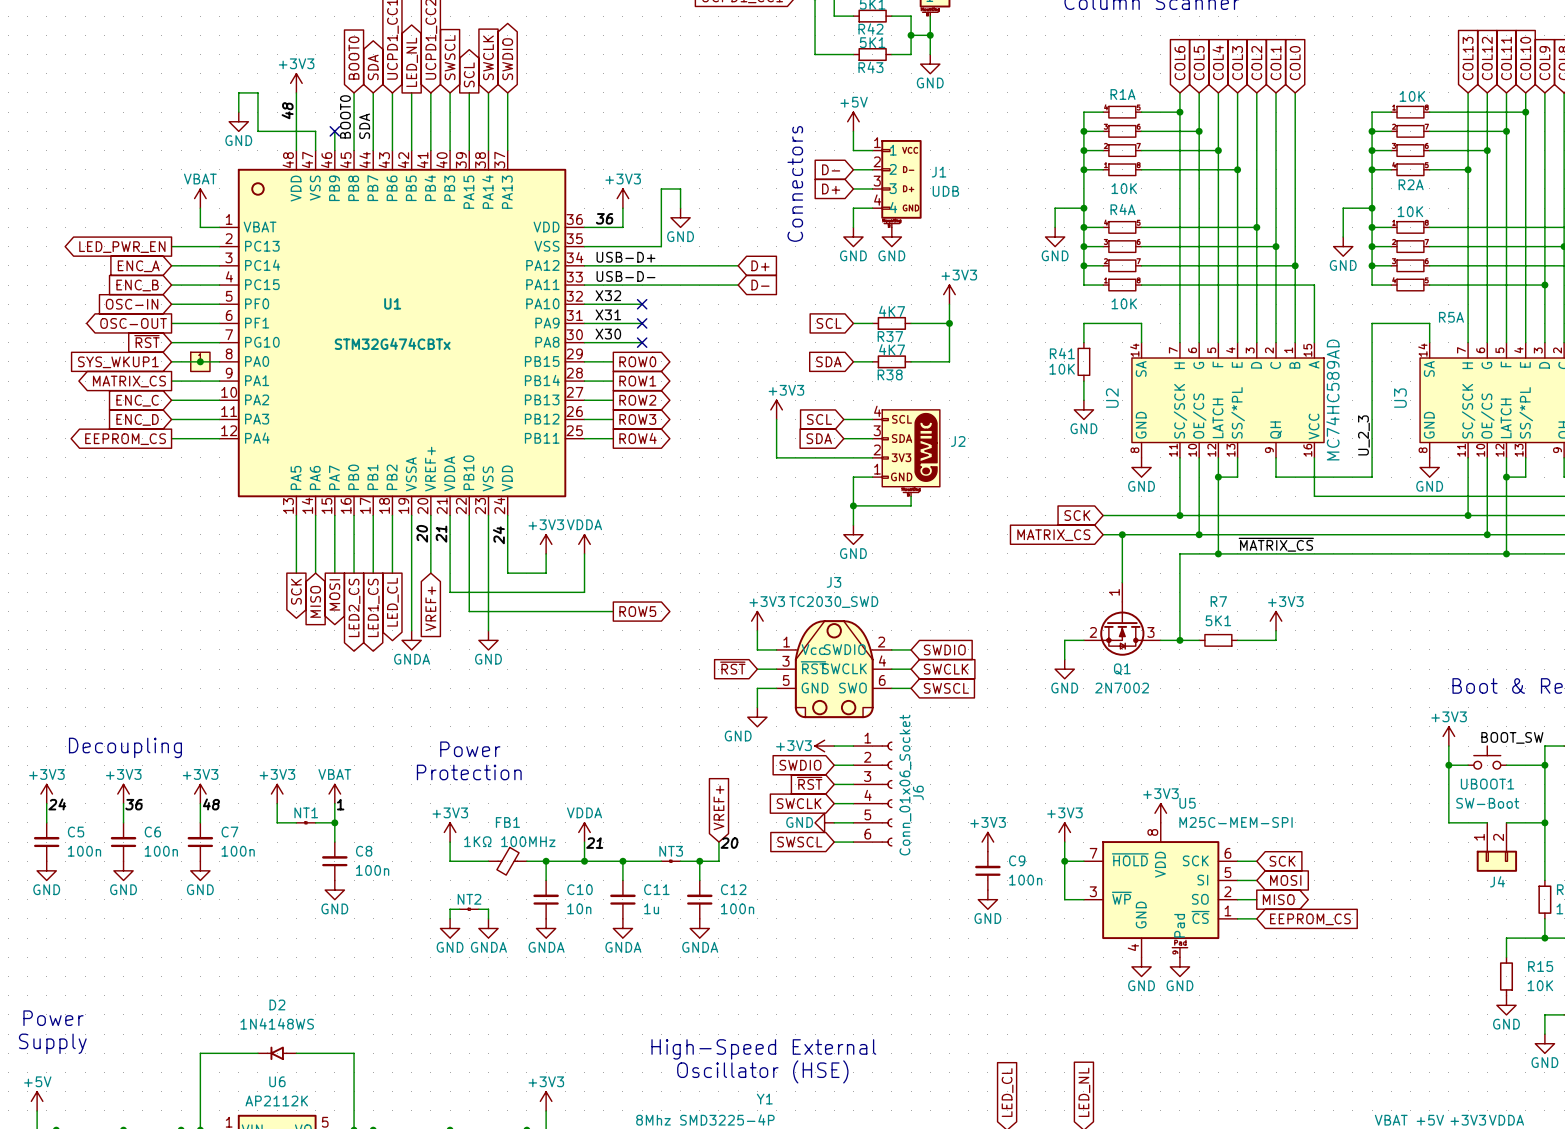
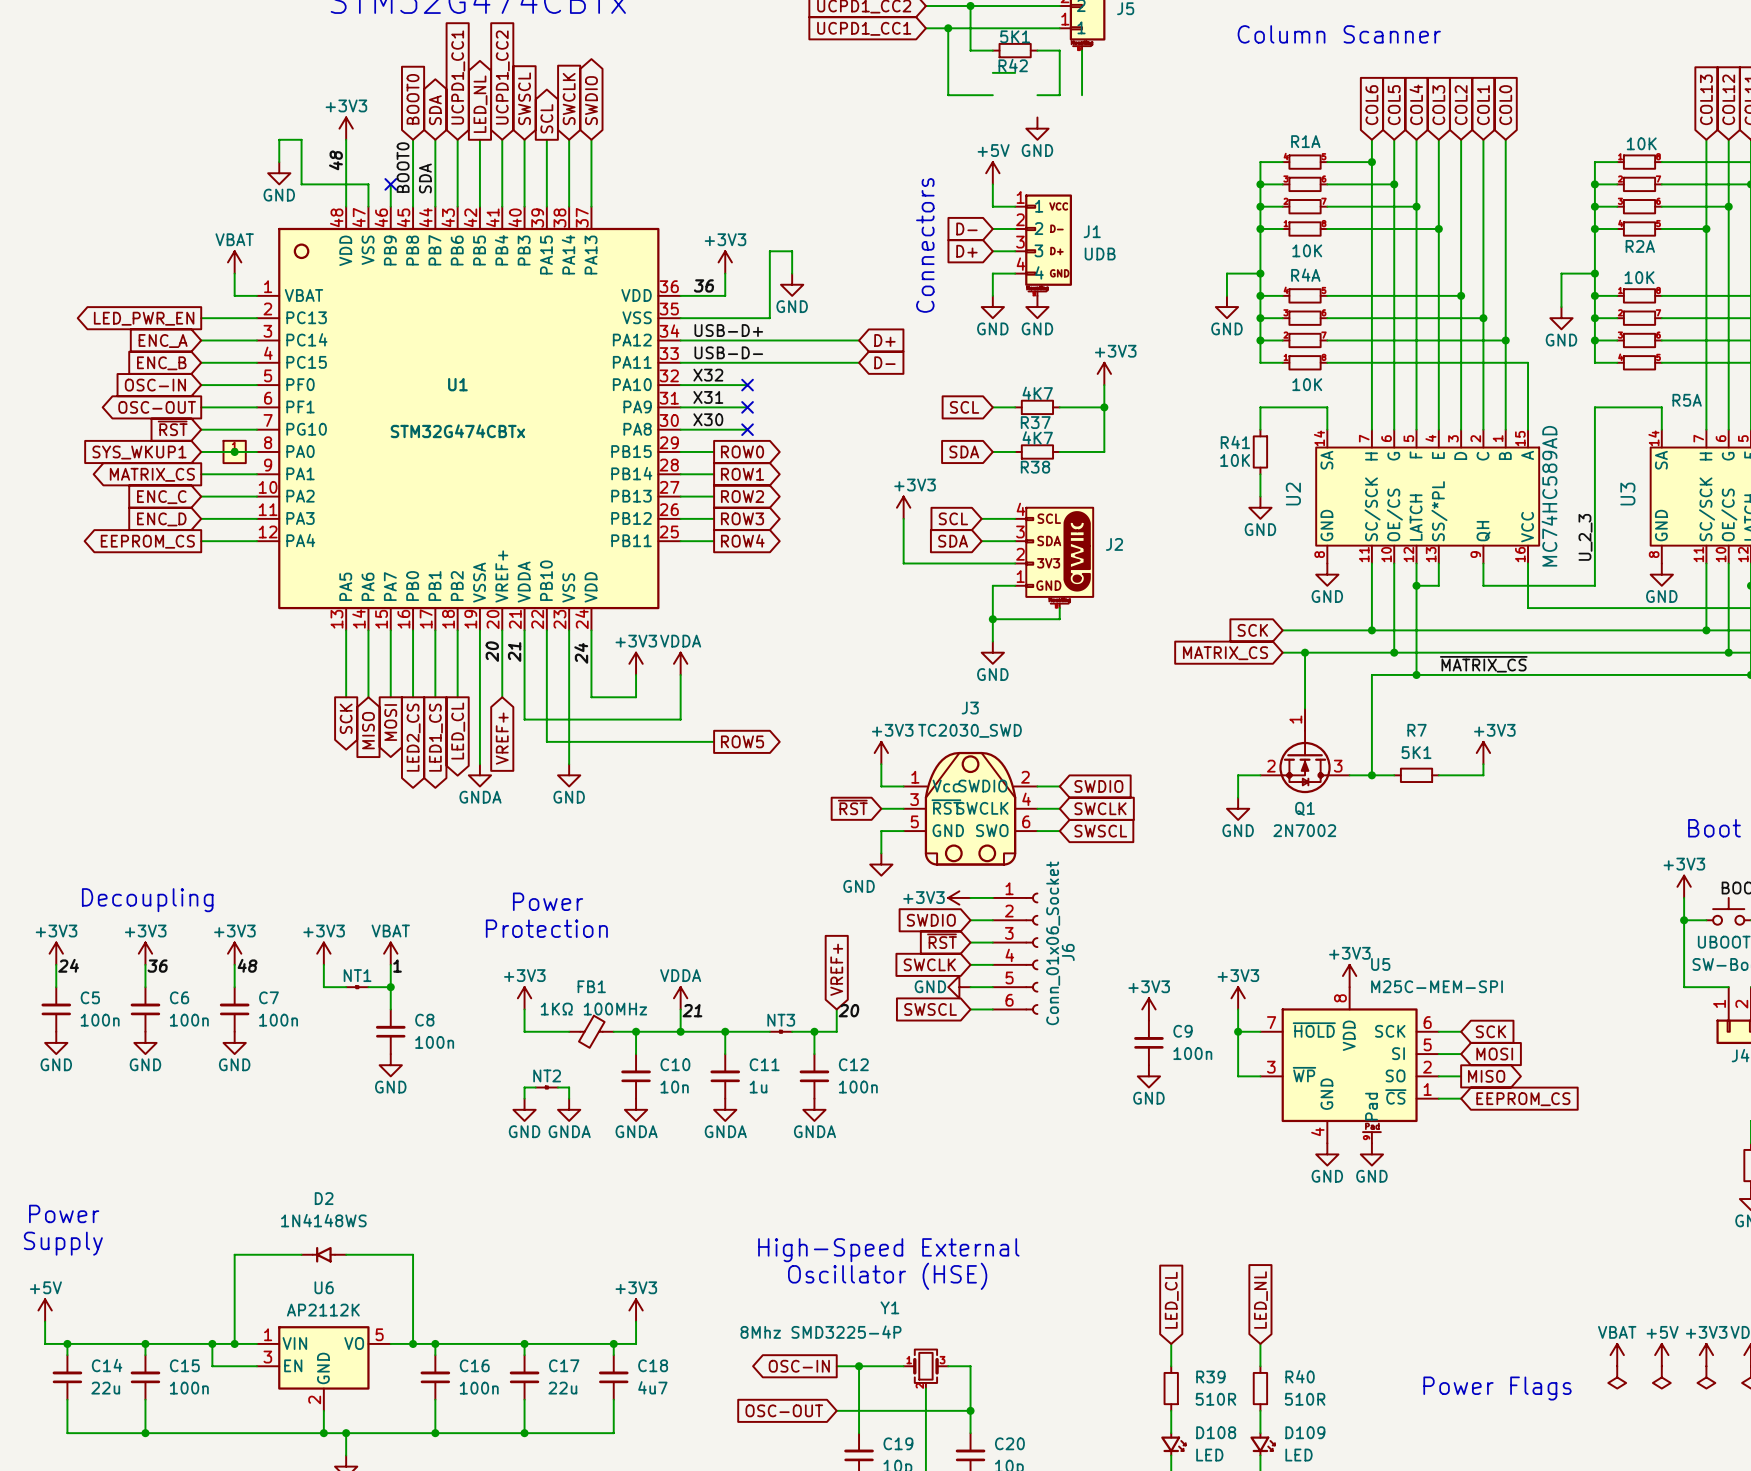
wire: (911, 35) (930, 35) -> (992, 72) (1015, 72)
junction: (911, 35) -> none
junction: (930, 35) -> none
R43: 5K1 (872, 54) -> none
power symbol position: GND (930, 64) -> GND (1037, 128)

